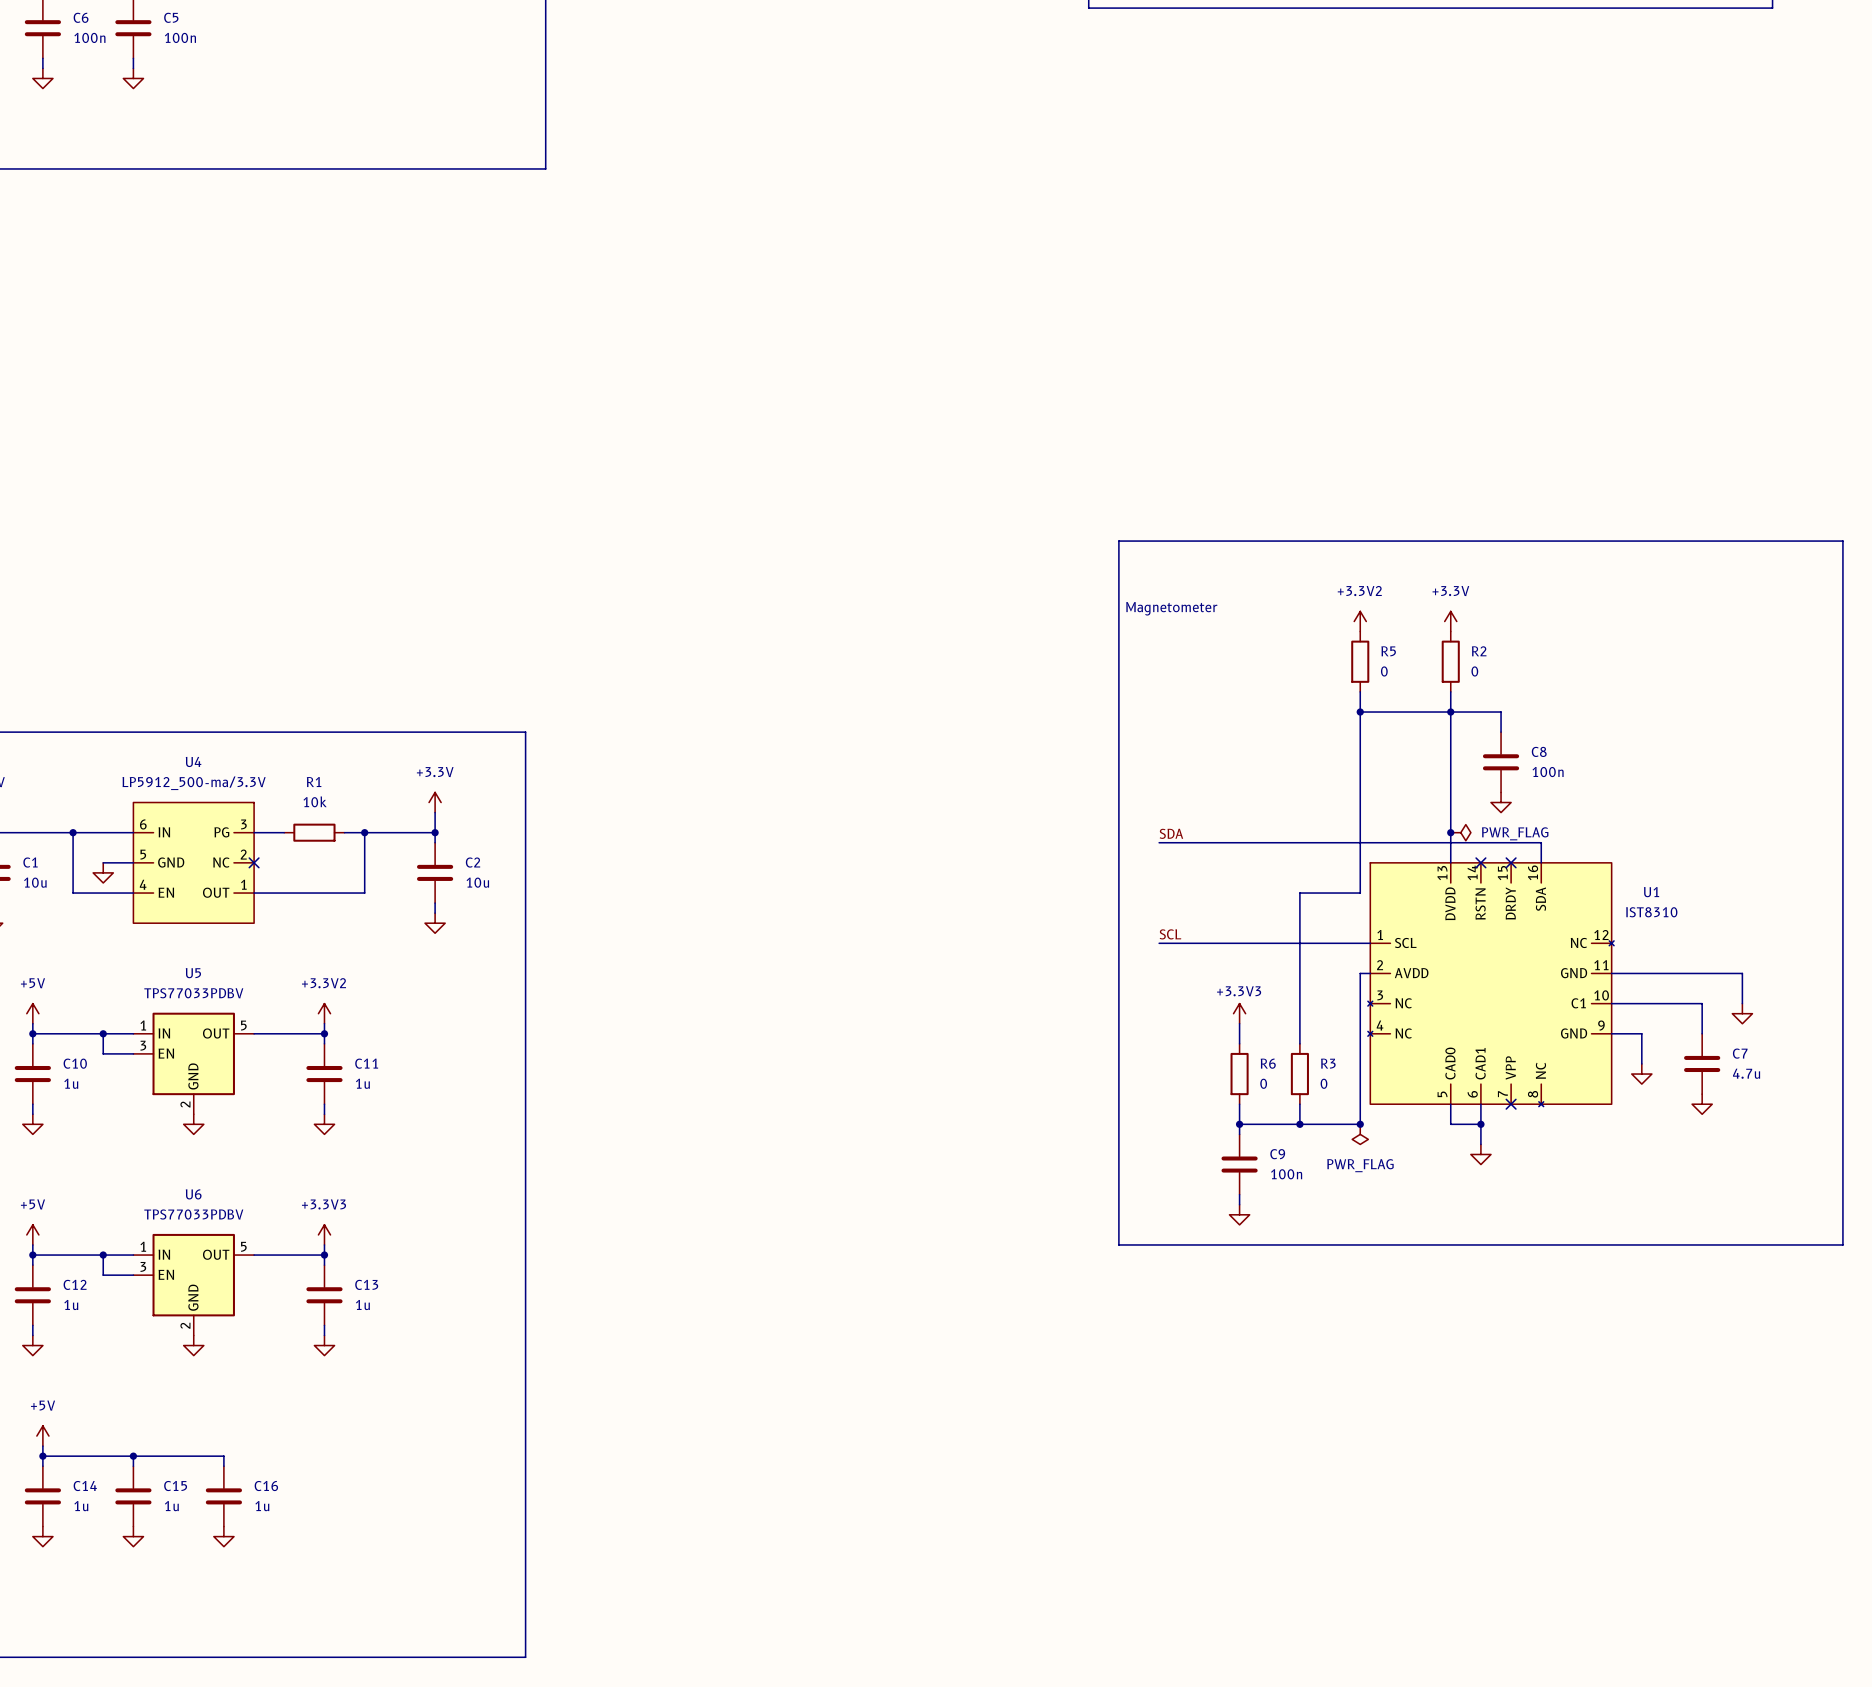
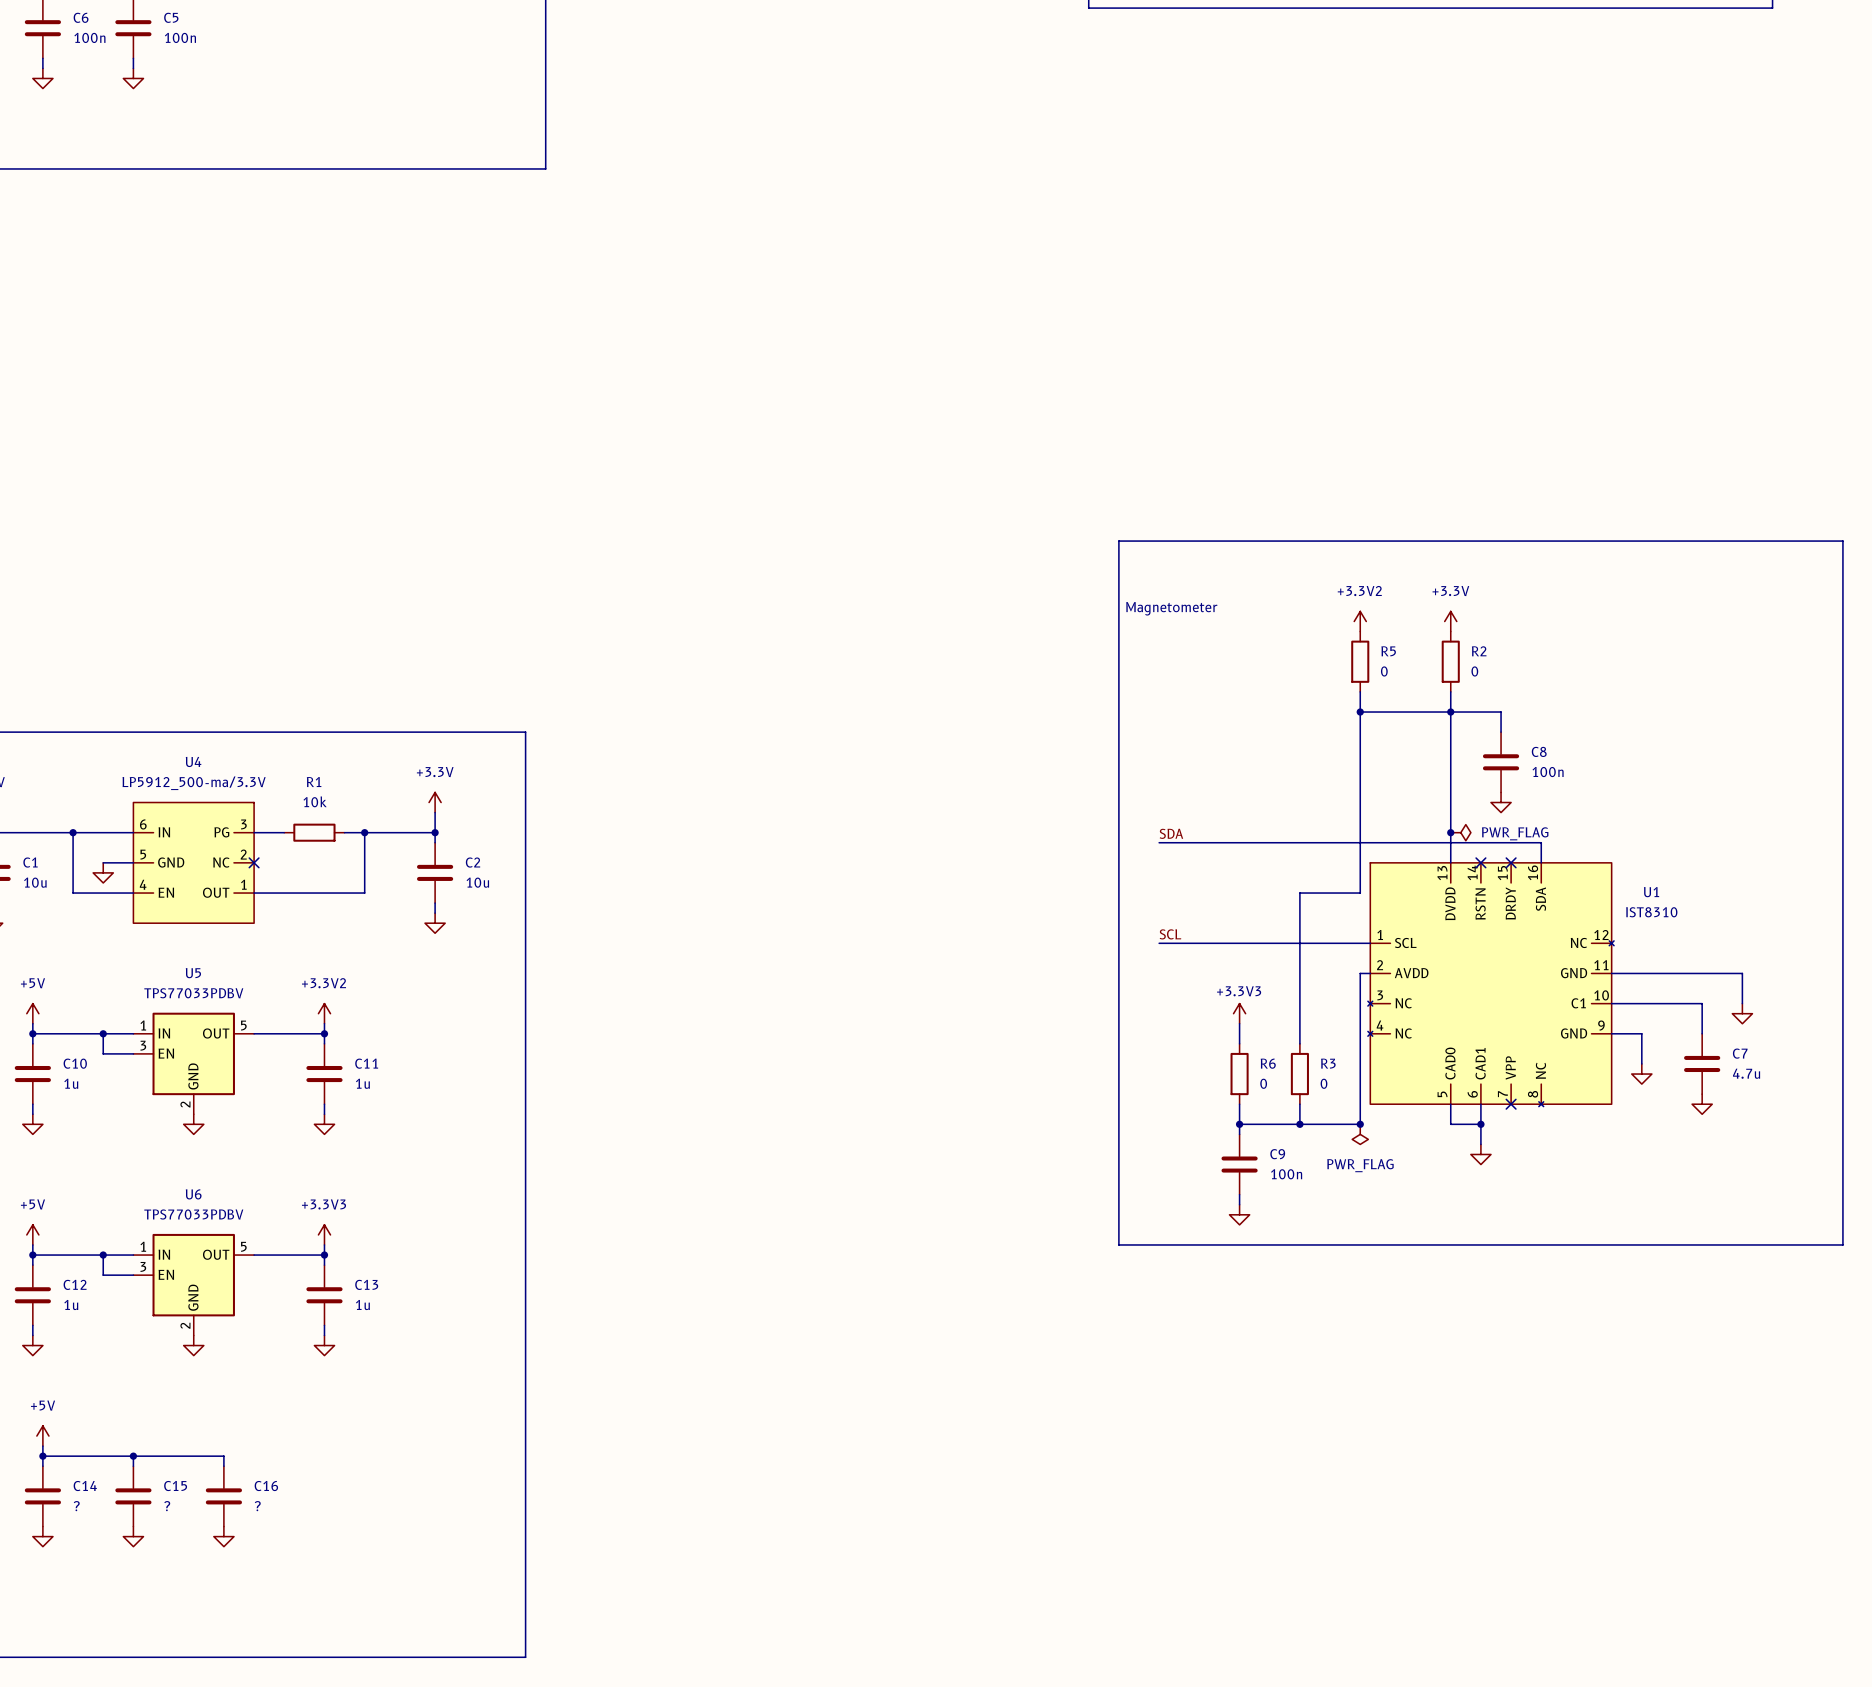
C14 value: 1u (81, 1506) -> ? (76, 1506)
C15 value: 1u (171, 1506) -> ? (167, 1506)
C16 value: 1u (262, 1506) -> ? (257, 1506)

